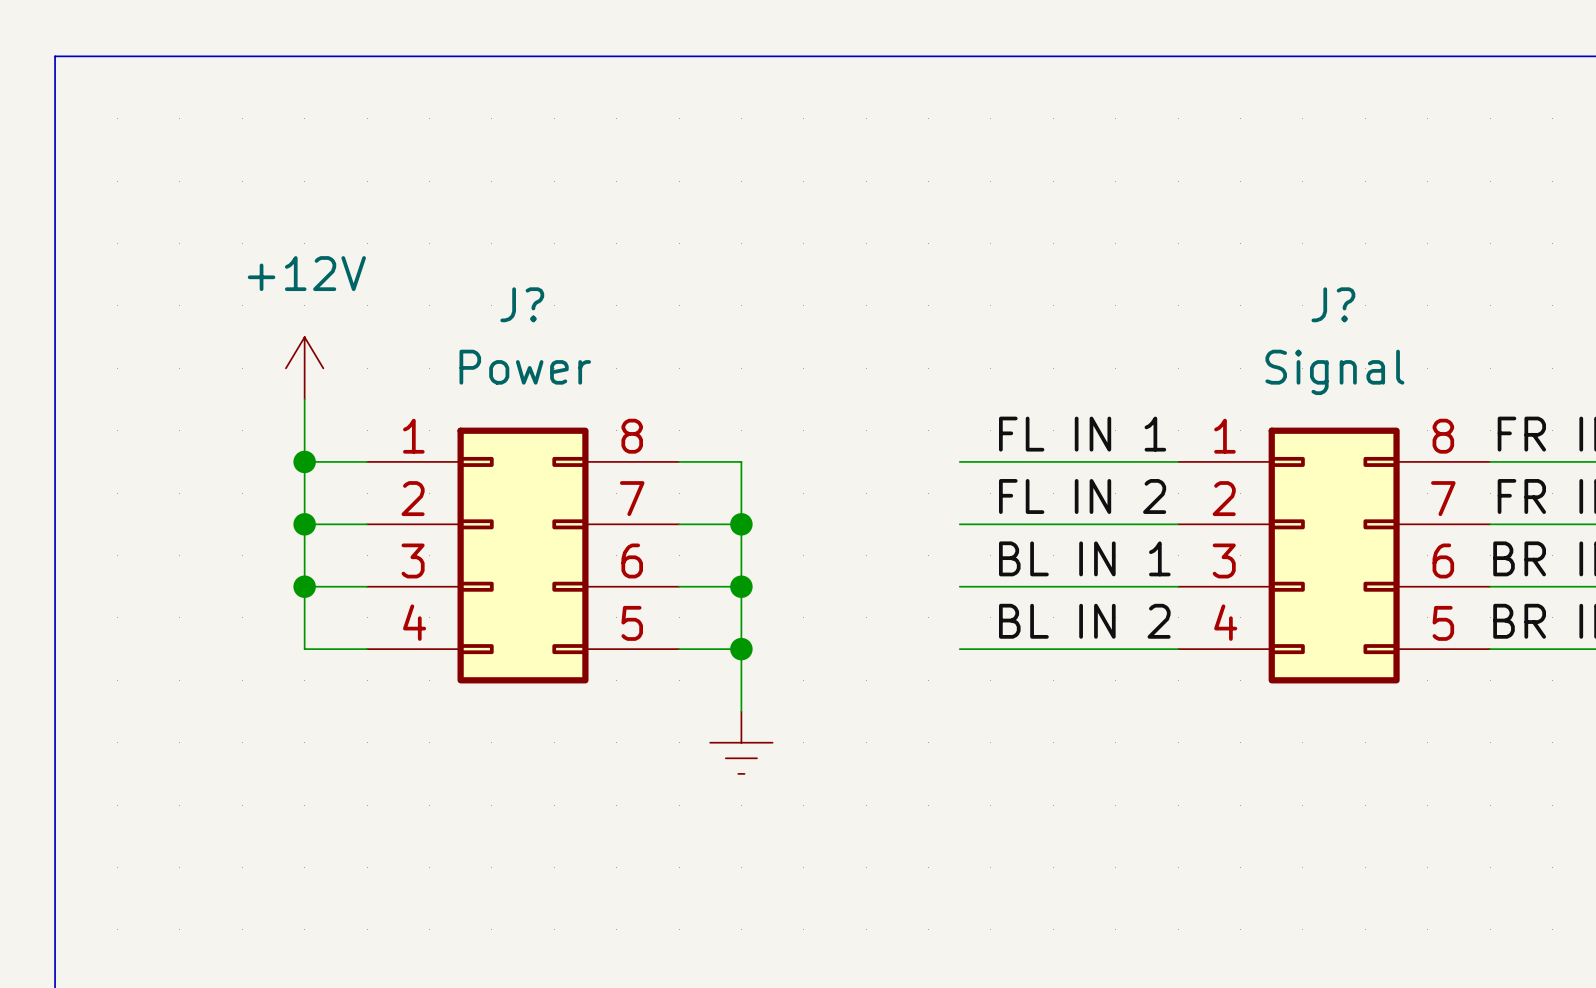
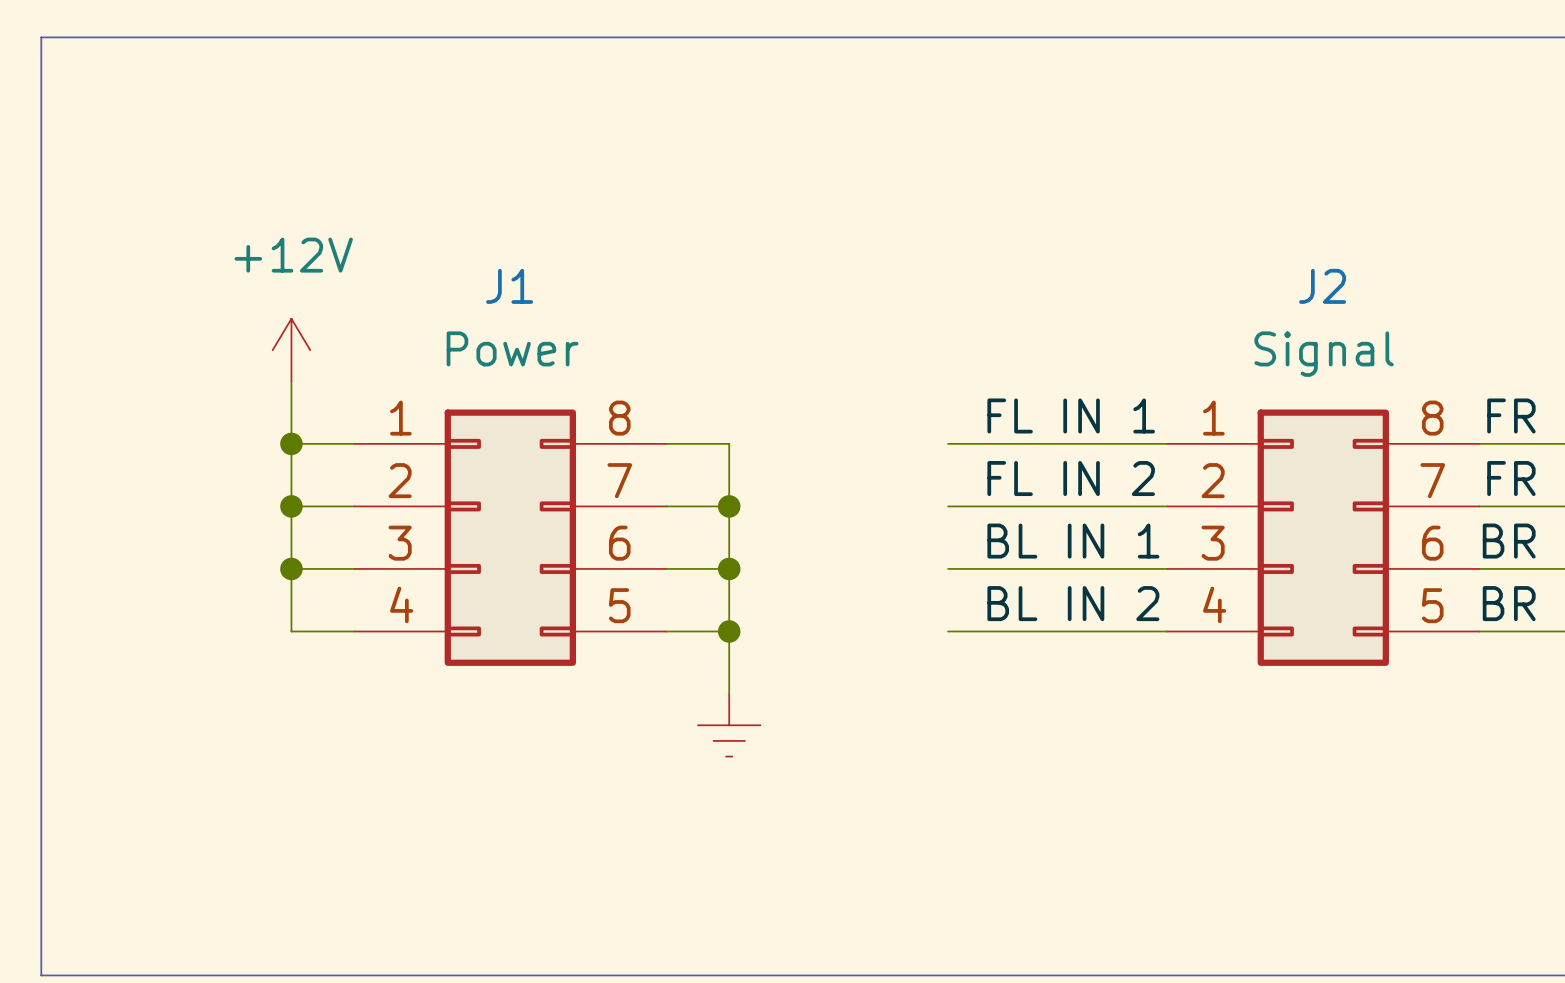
J? name: J? (522, 304) -> J1 (509, 286)
J? name: J? (1333, 304) -> J2 (1322, 286)

